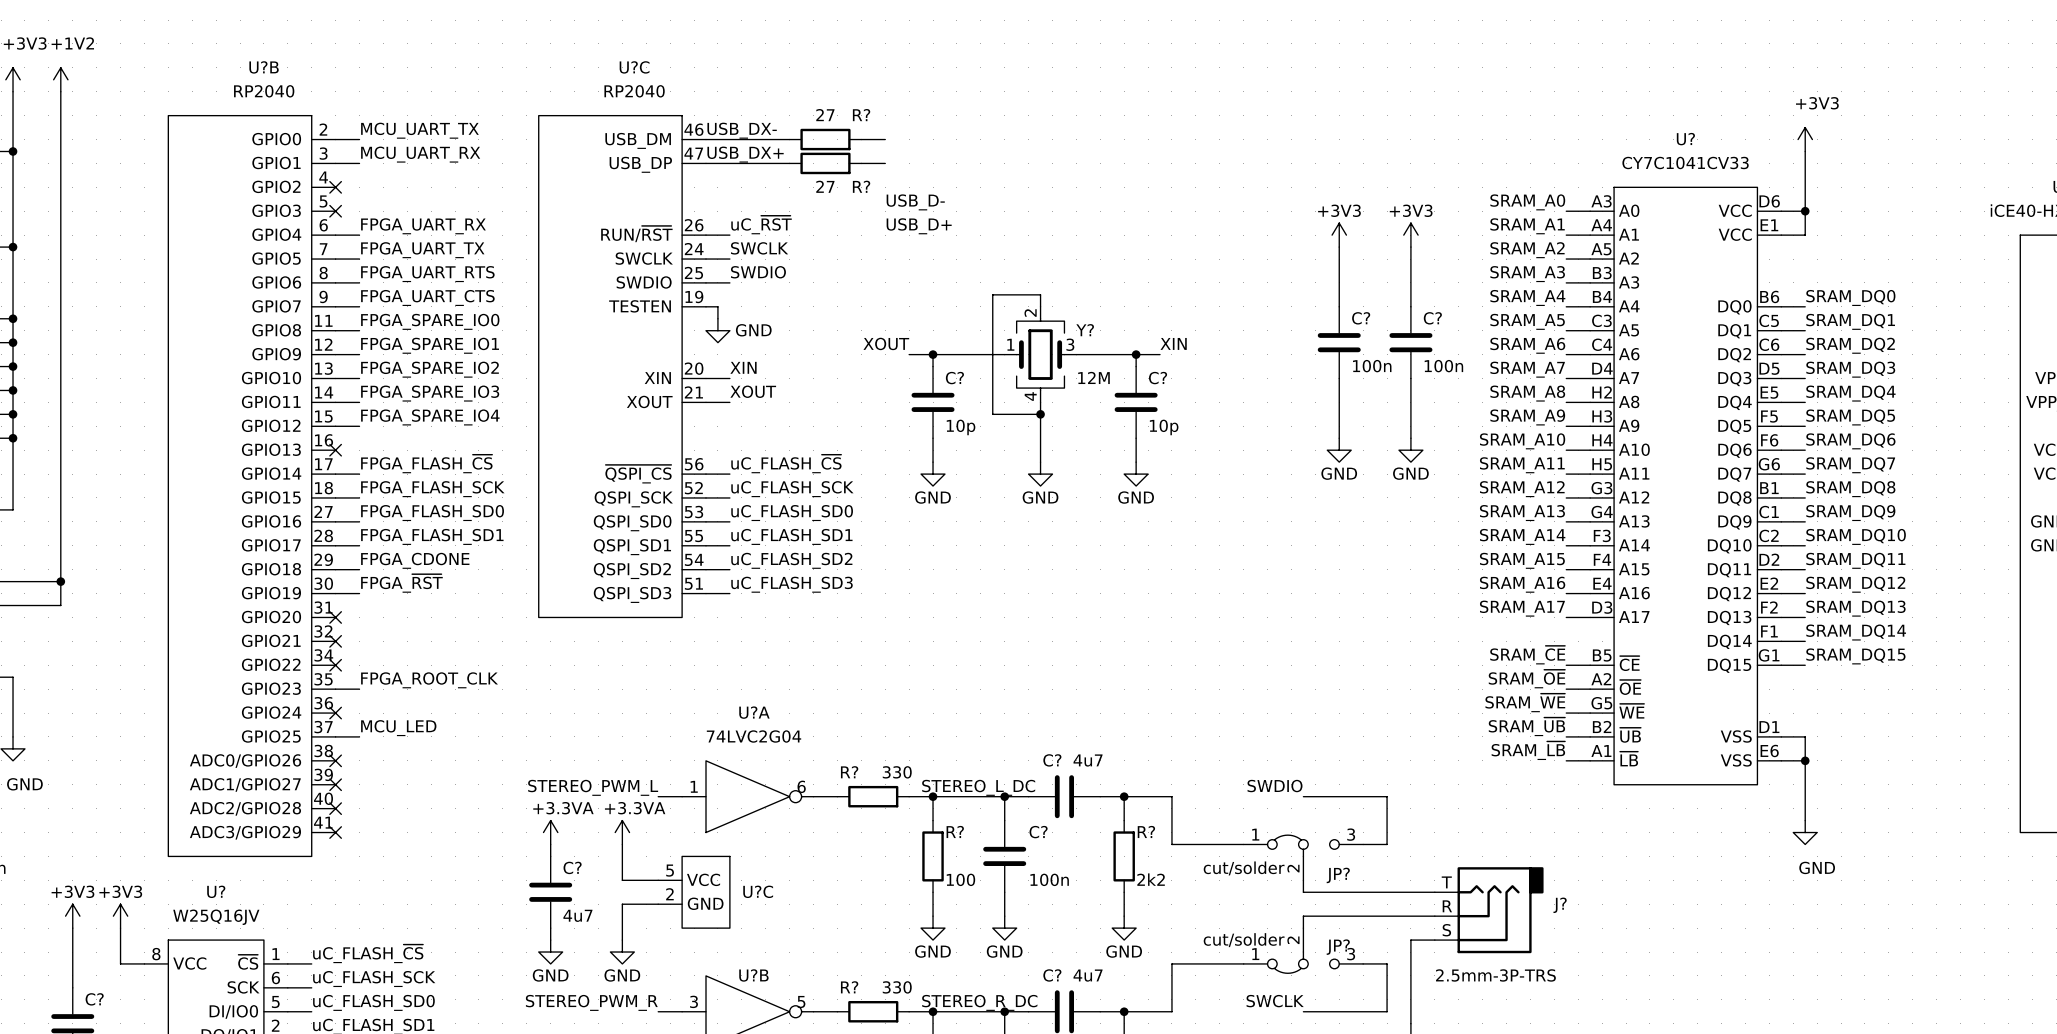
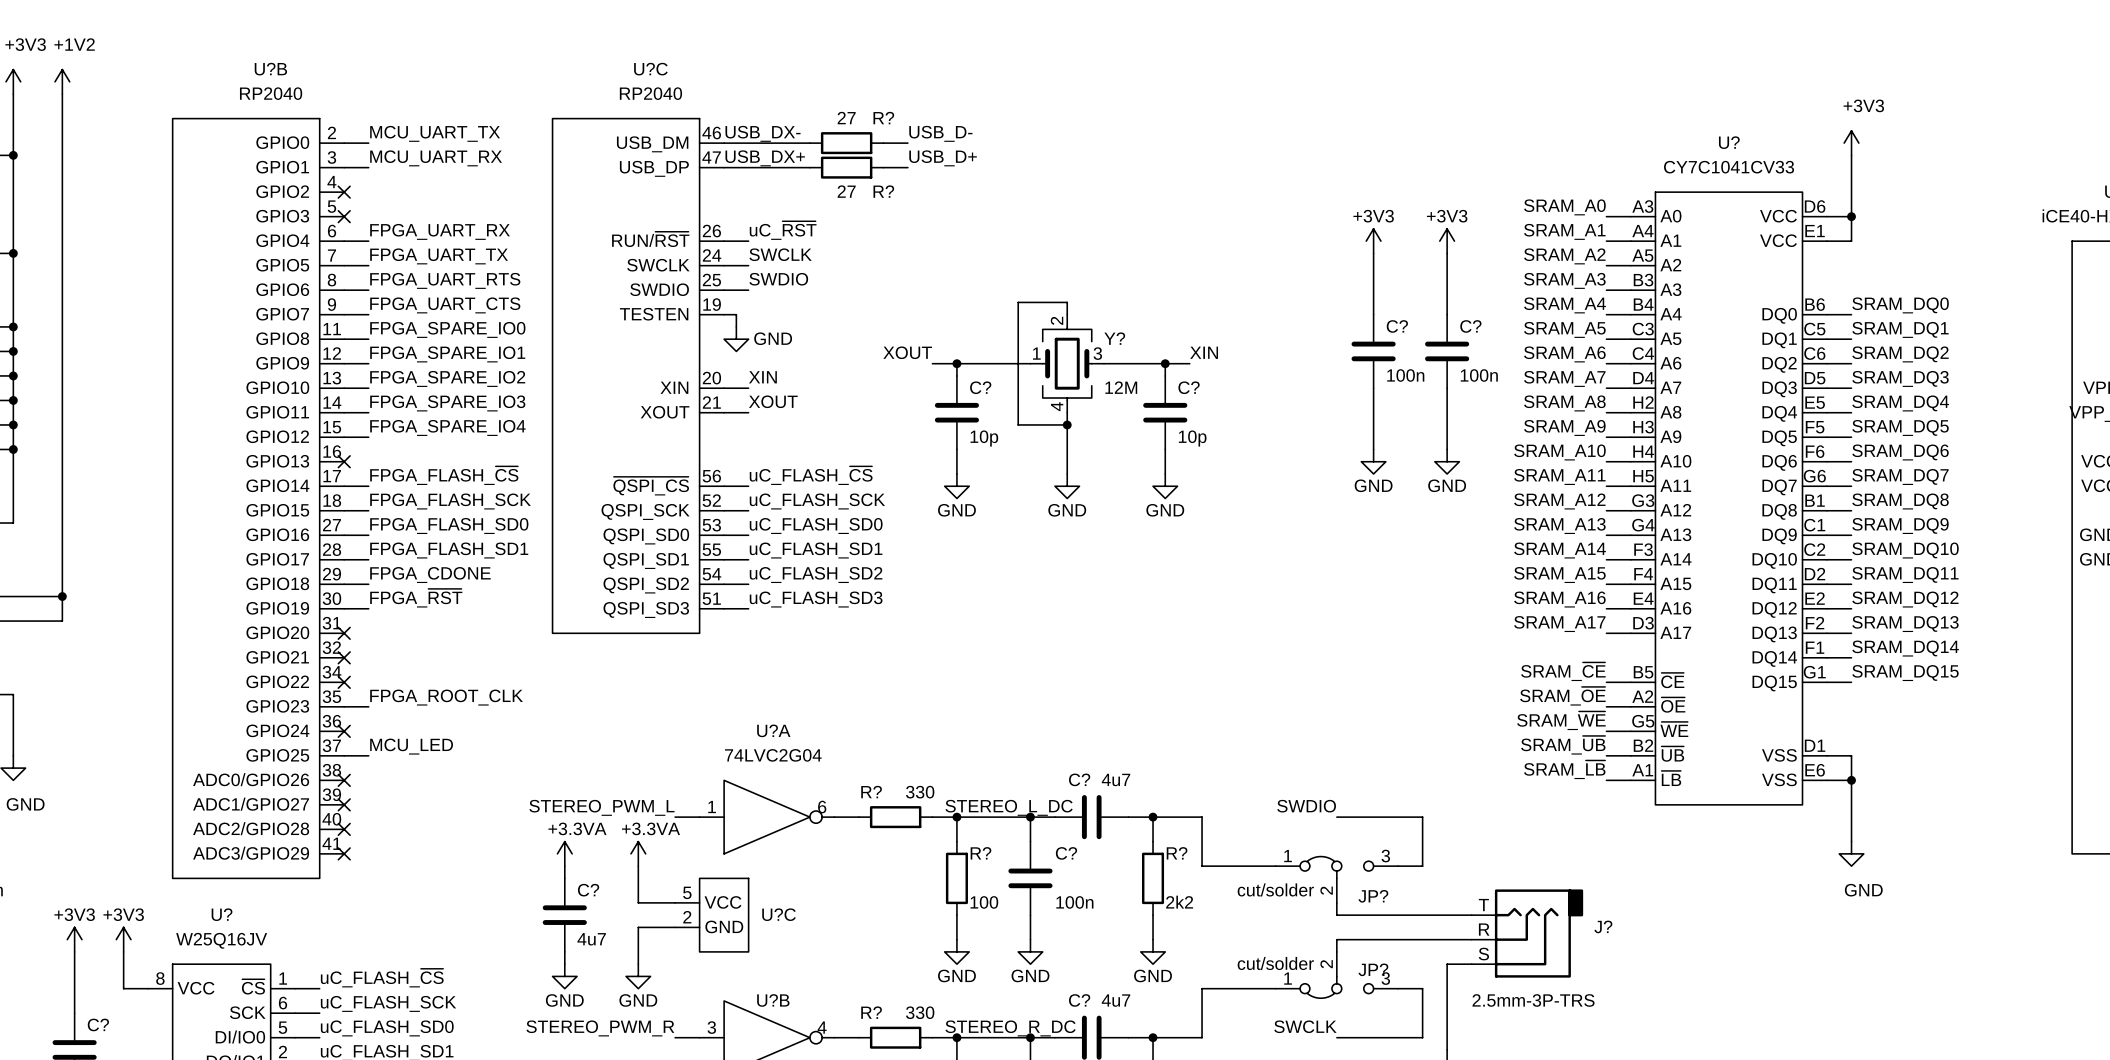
label position: USB_D- (915, 202) -> USB_D- (940, 133)
label position: USB_D+ (919, 226) -> USB_D+ (943, 158)
U?B pin number: 5 (801, 1002) -> 4 (822, 1027)

